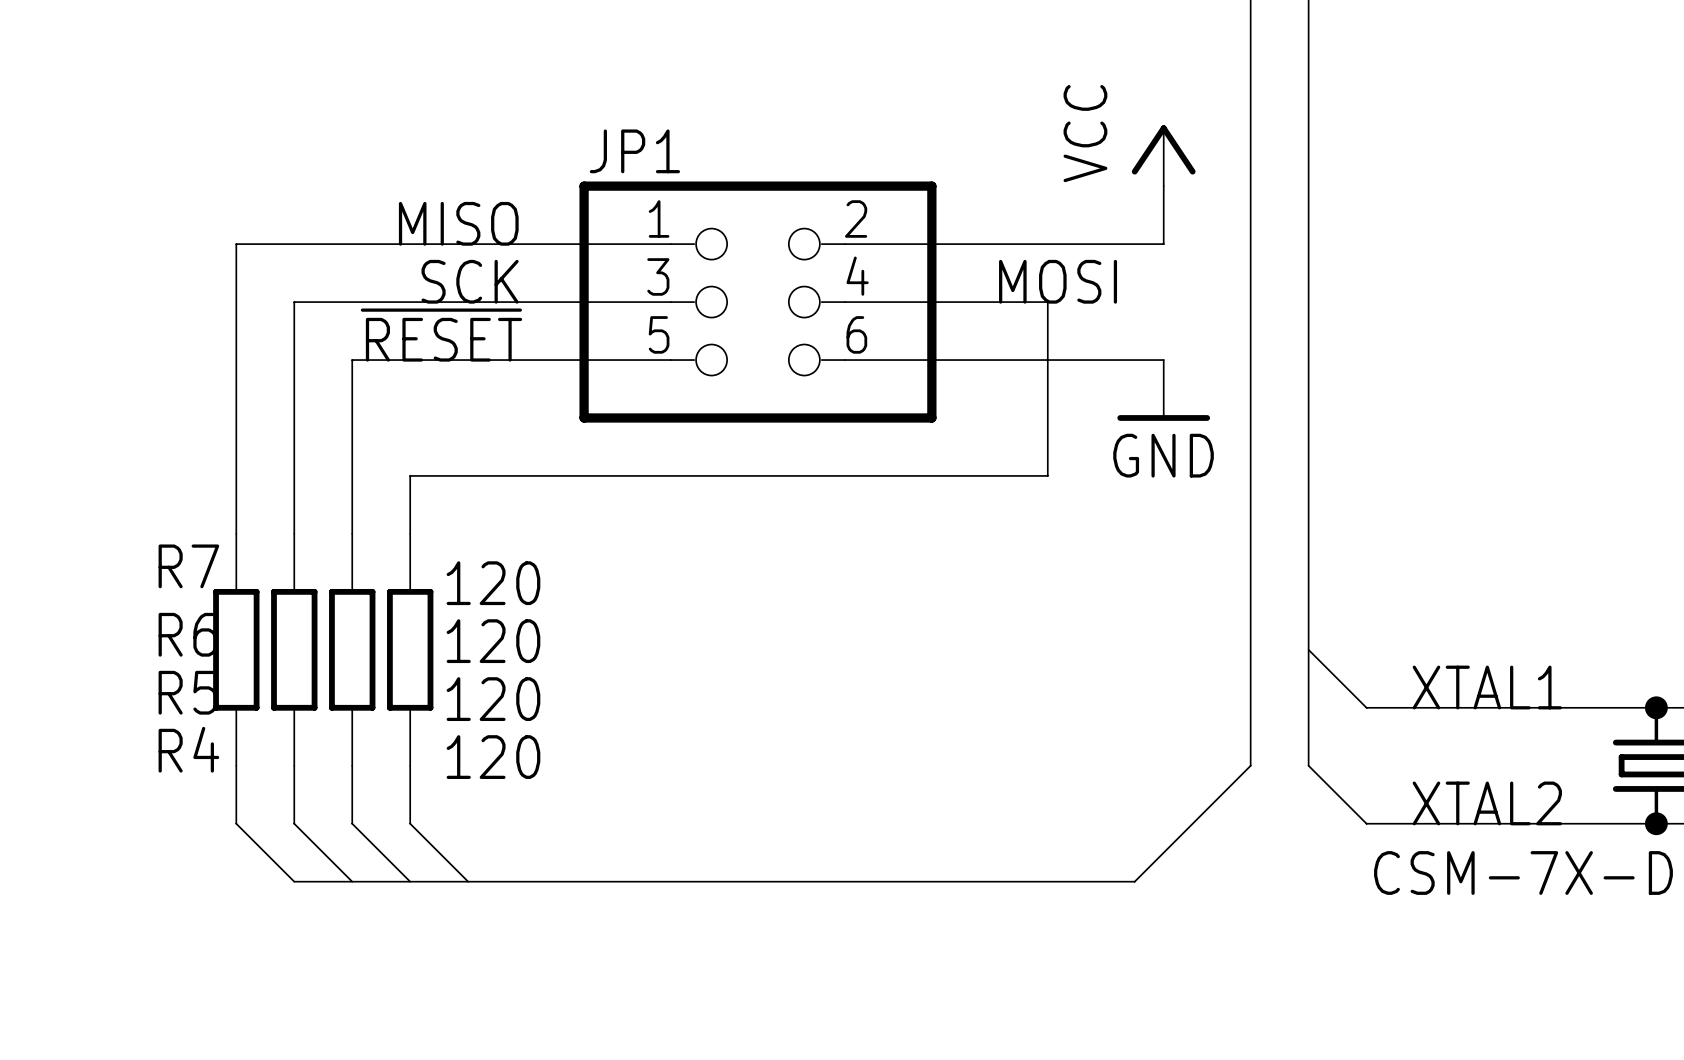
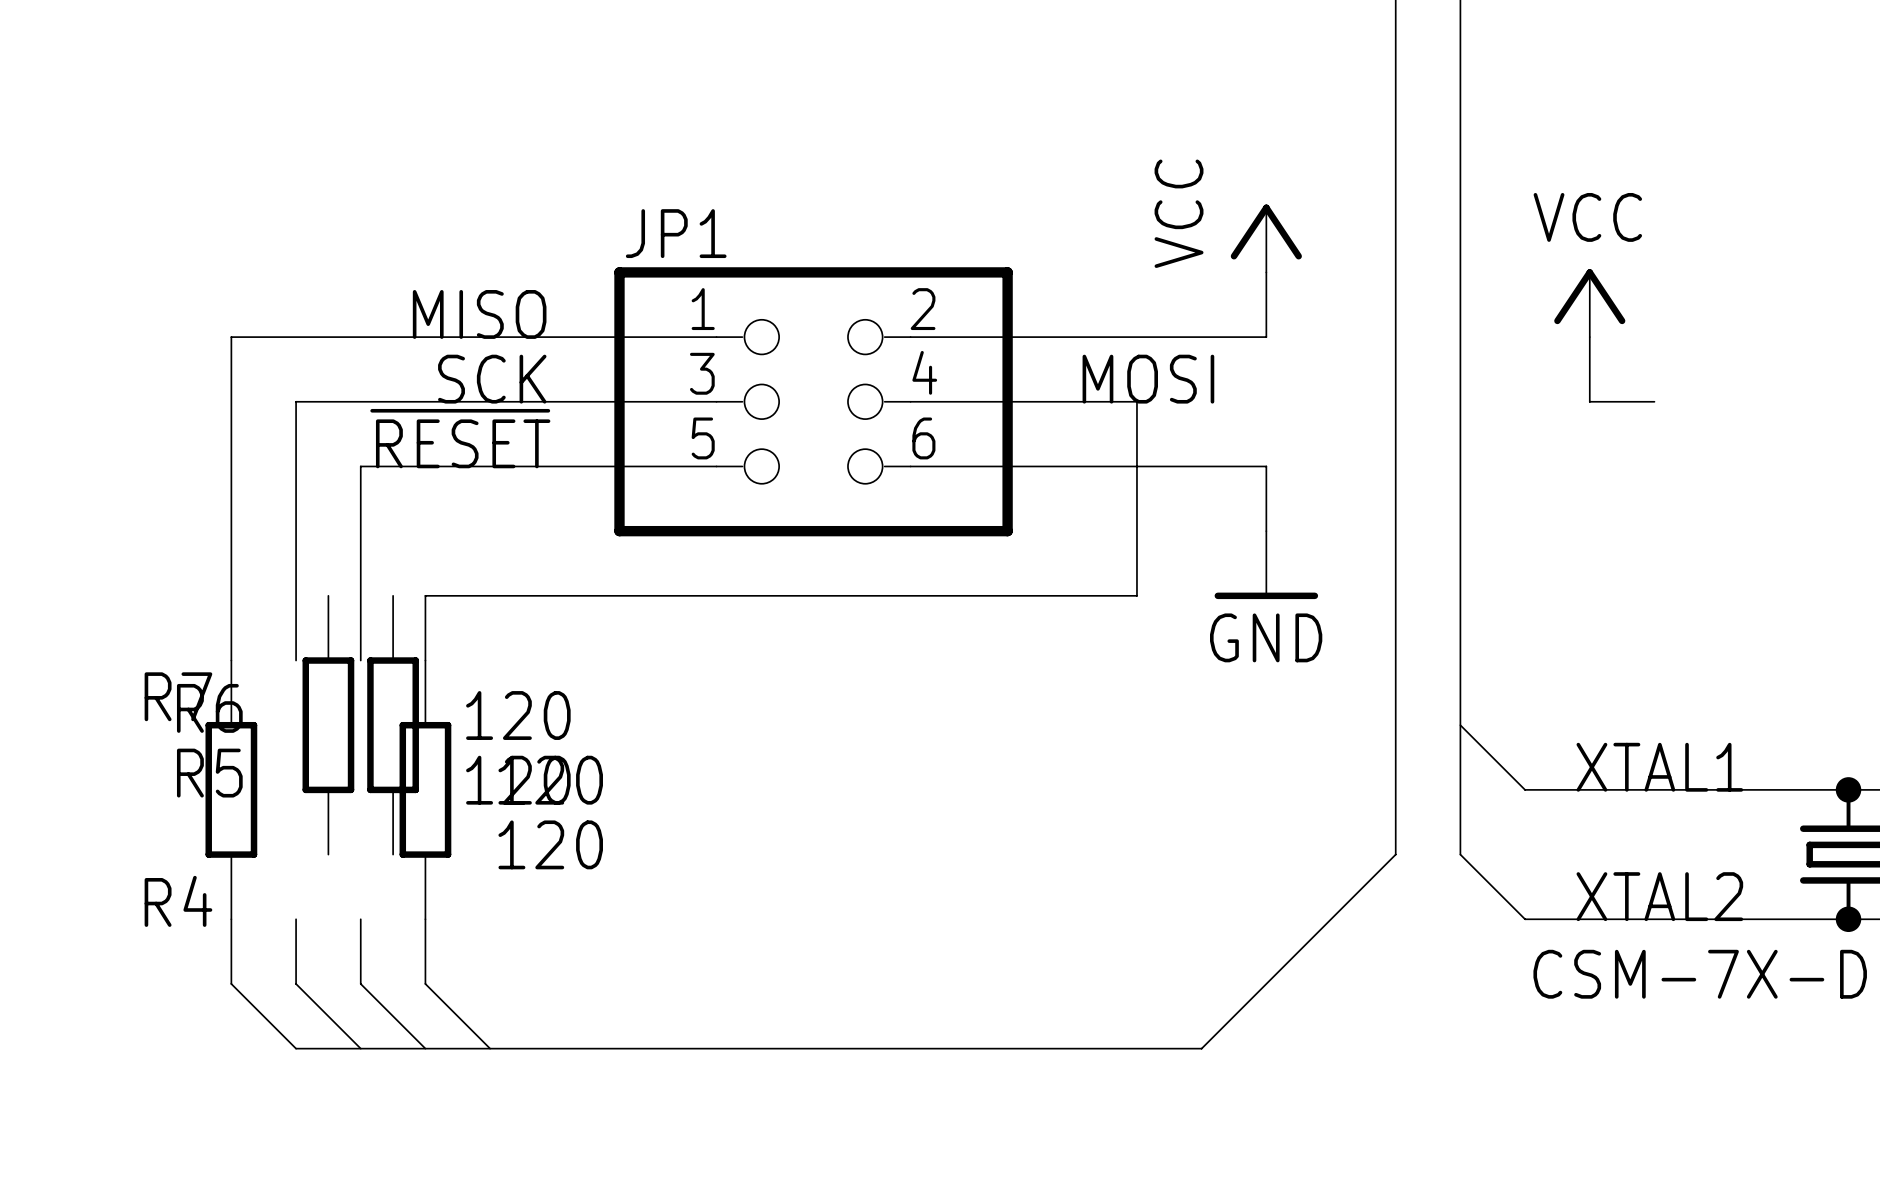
power symbol position: VCC (1163, 155) -> VCC (1266, 238)
wire: (1163, 186) (1163, 244) (844, 244) -> none
label position: MISO (458, 223) -> MISO (479, 314)
wire: (671, 244) (236, 244) (236, 533) -> none
power symbol: none -> VCC (1589, 303)
label position: SCK (470, 281) -> SCK (492, 379)
label position: MOSI (1058, 281) -> MOSI (1148, 379)
wire: (294, 302) (294, 533) -> (328, 337) (231, 337) (231, 660)
JP1 position: (757, 302) -> (813, 401)
wire: (1047, 302) (1047, 475) (410, 475) (410, 533) -> (1169, 337) (1266, 337) (1266, 272)
wire: none -> (1589, 337) (1589, 401) (1654, 401)
label position: ~{RESET} (441, 335) -> ~{RESET} (460, 438)
wire: (352, 360) (352, 533) -> (393, 401) (296, 401) (296, 660)
wire: (1018, 360) (1163, 360) -> (1136, 401) (1136, 595) (425, 595) (425, 660)
power symbol position: GND (1163, 390) -> GND (1266, 565)
wire: none -> (716, 466) (360, 466) (360, 660)
wire: none -> (910, 466) (1266, 466) (1266, 531)
R7 position: (236, 649) -> (231, 789)
R4 position: (410, 649) -> (425, 789)
wire: (236, 765) (236, 823) (294, 881) -> (231, 919) (231, 983) (296, 1048)
wire: (294, 765) (294, 823) (352, 881) -> (296, 919) (296, 983) (360, 1048)
wire: (352, 765) (352, 823) (410, 881) -> (360, 919) (360, 983) (425, 1048)
wire: (410, 765) (410, 823) (468, 881) -> (425, 919) (425, 983) (490, 1048)
bus: (294, 881) (1134, 881) -> (296, 1048) (1201, 1048) (1266, 983)

